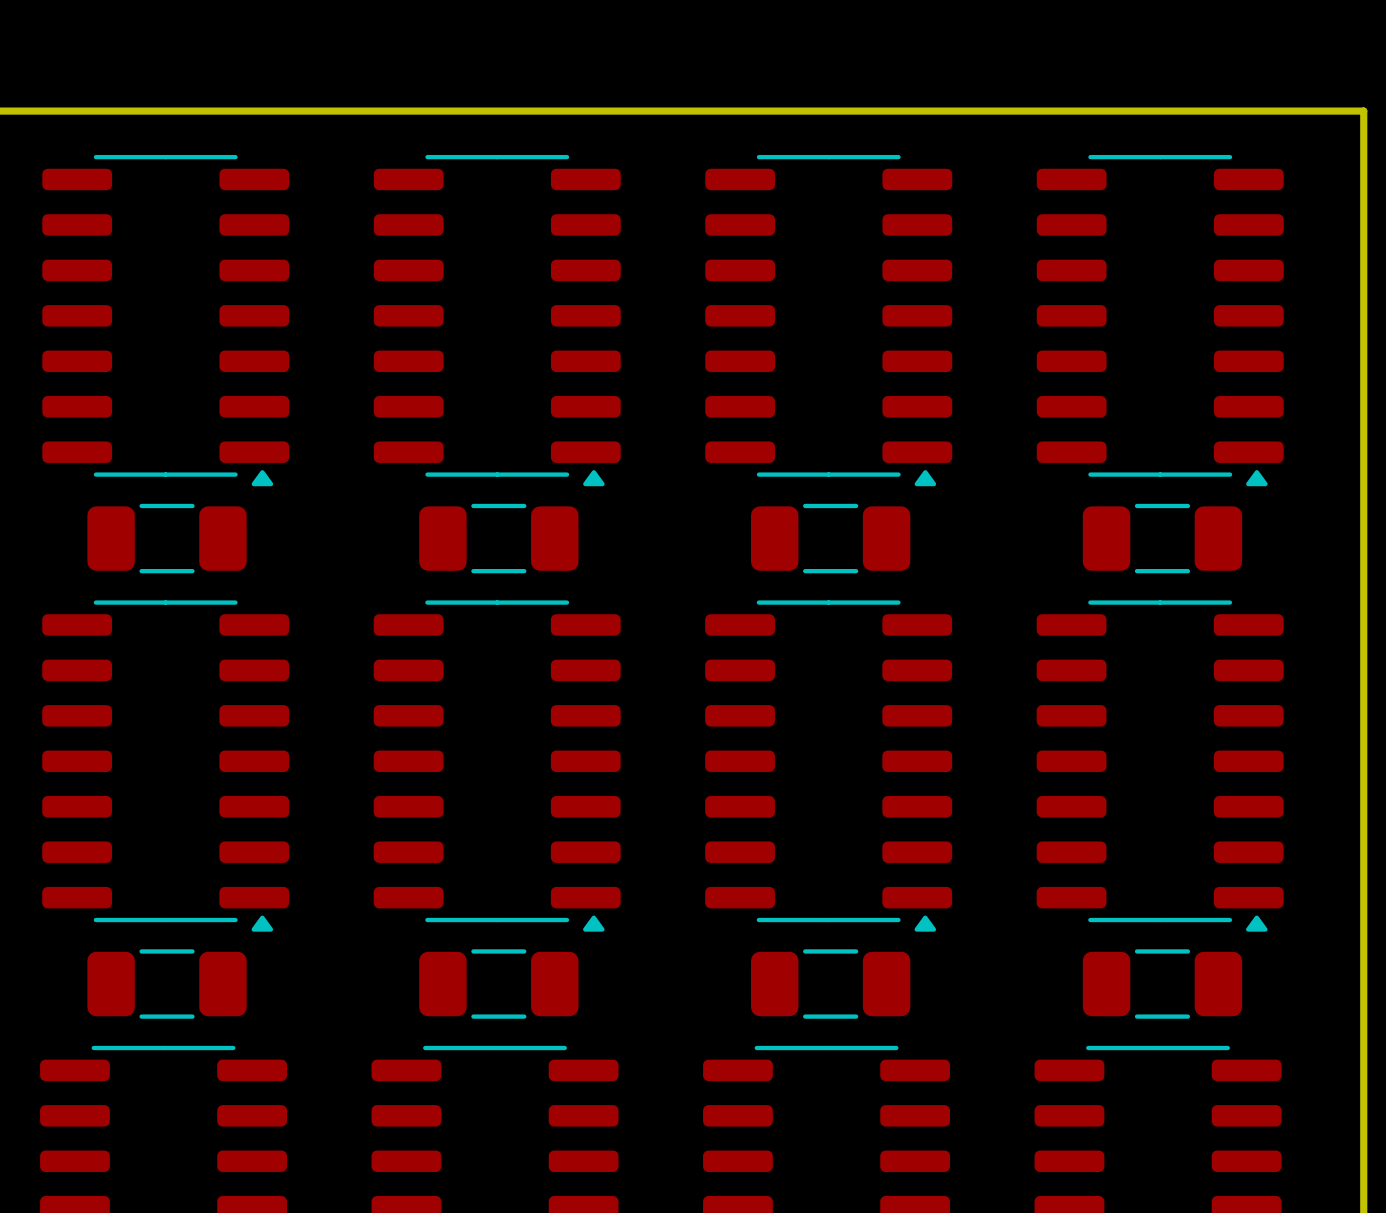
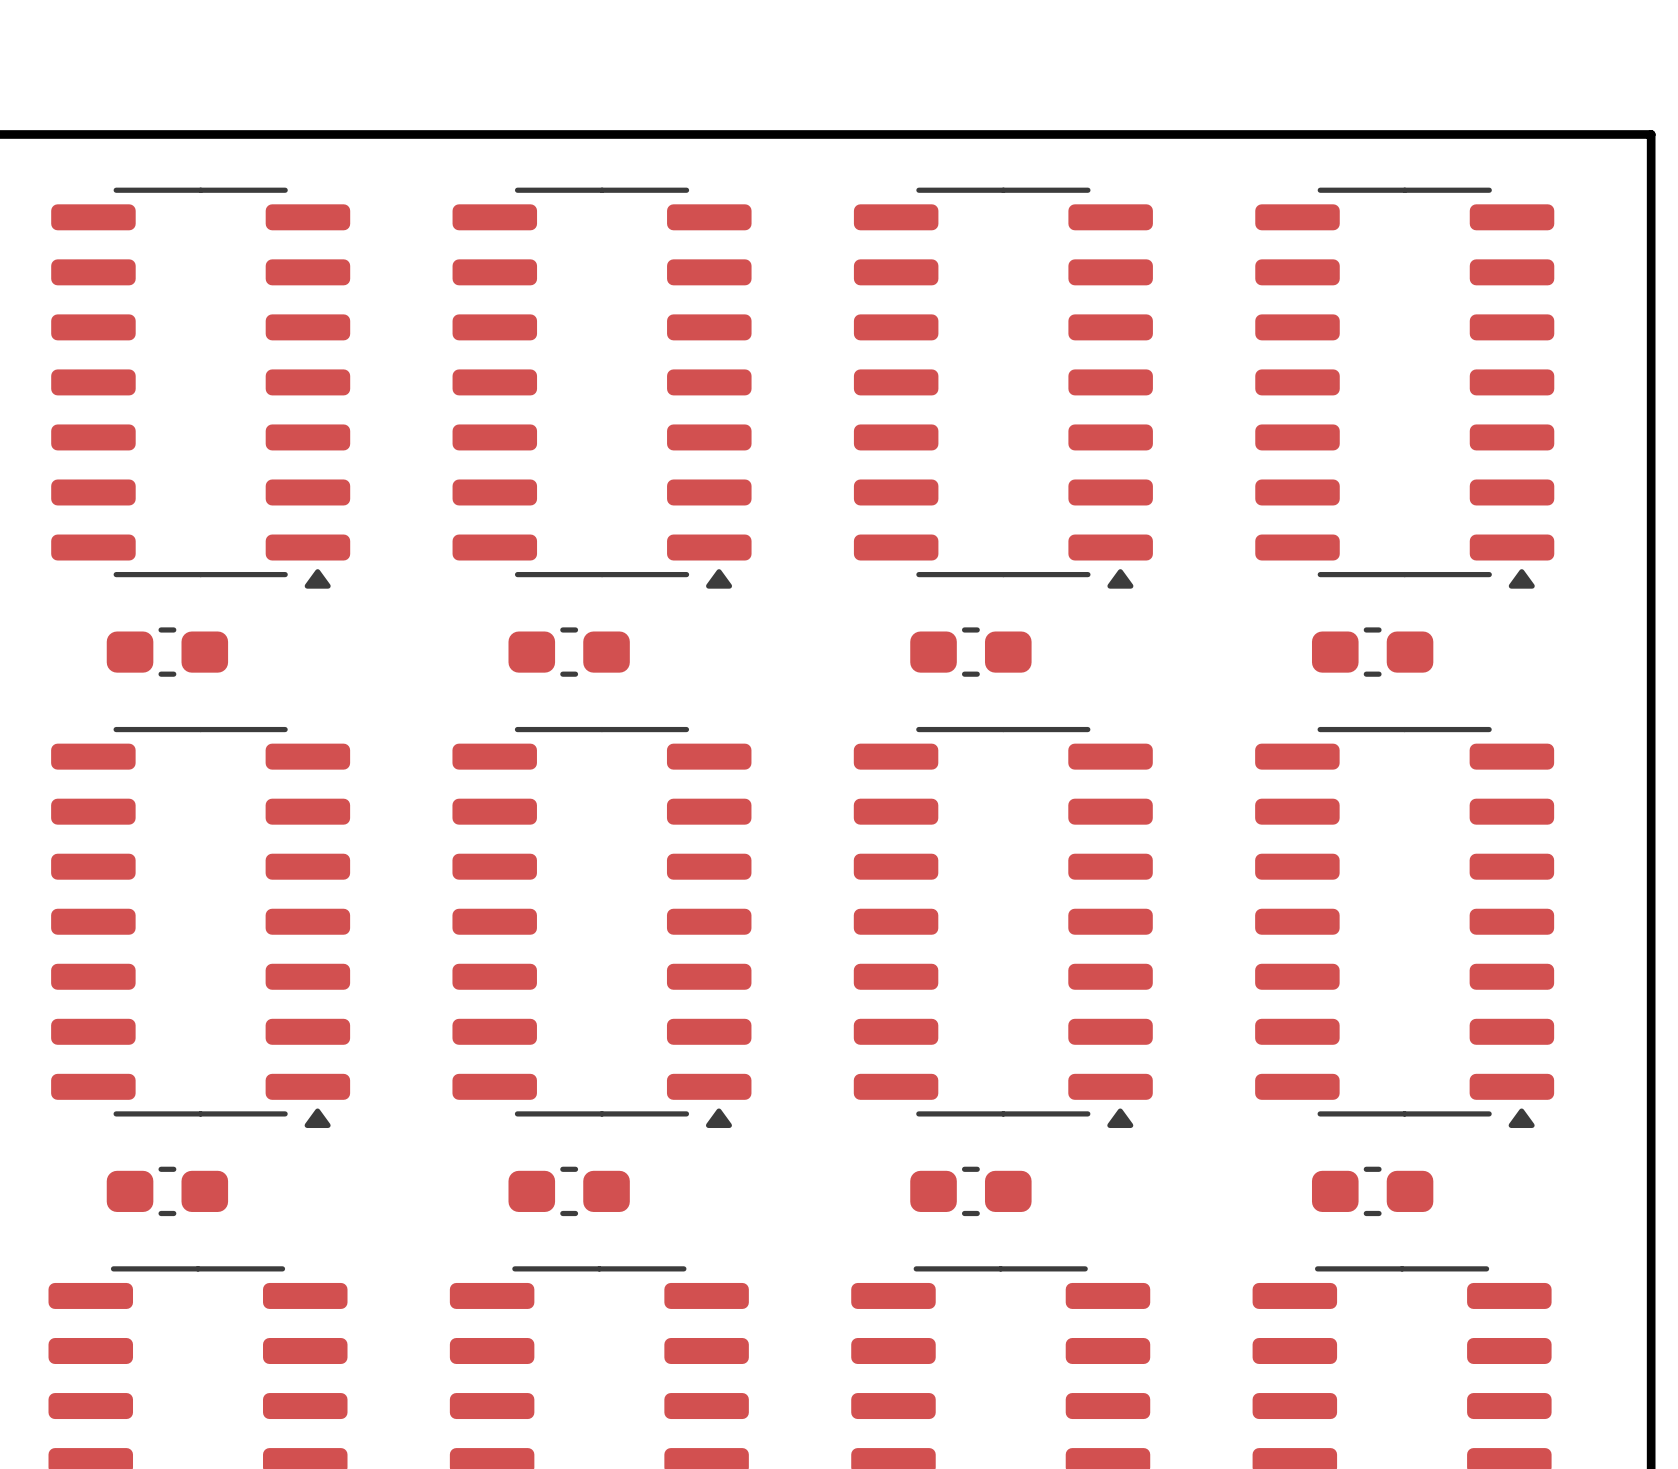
part footprint: [87, 503, 247, 574] -> [106, 627, 229, 677]
part footprint: [419, 503, 579, 574] -> [508, 627, 630, 677]
part footprint: [751, 503, 911, 574] -> [910, 627, 1032, 677]
part footprint: [1082, 503, 1243, 574] -> [1311, 627, 1434, 677]
part footprint: [87, 949, 247, 1019] -> [106, 1166, 229, 1217]
part footprint: [419, 949, 579, 1019] -> [508, 1166, 630, 1217]
part footprint: [751, 949, 911, 1019] -> [910, 1166, 1032, 1217]
part footprint: [1082, 949, 1243, 1019] -> [1311, 1166, 1434, 1217]

